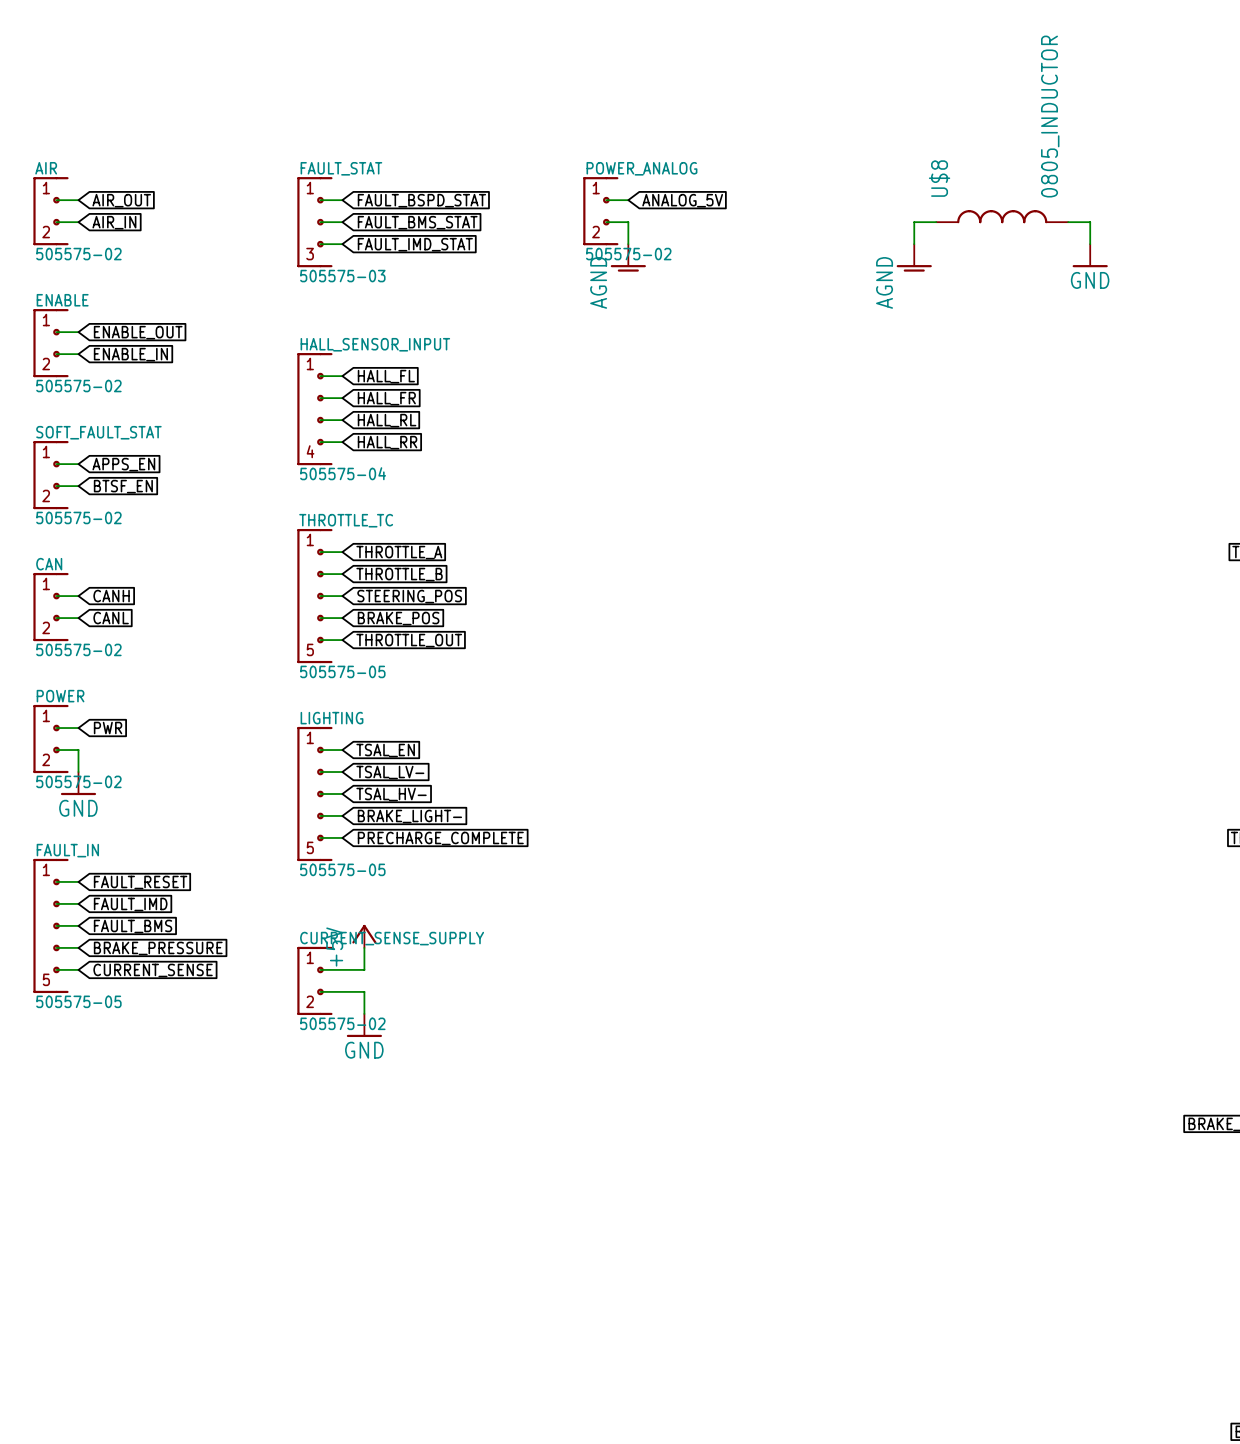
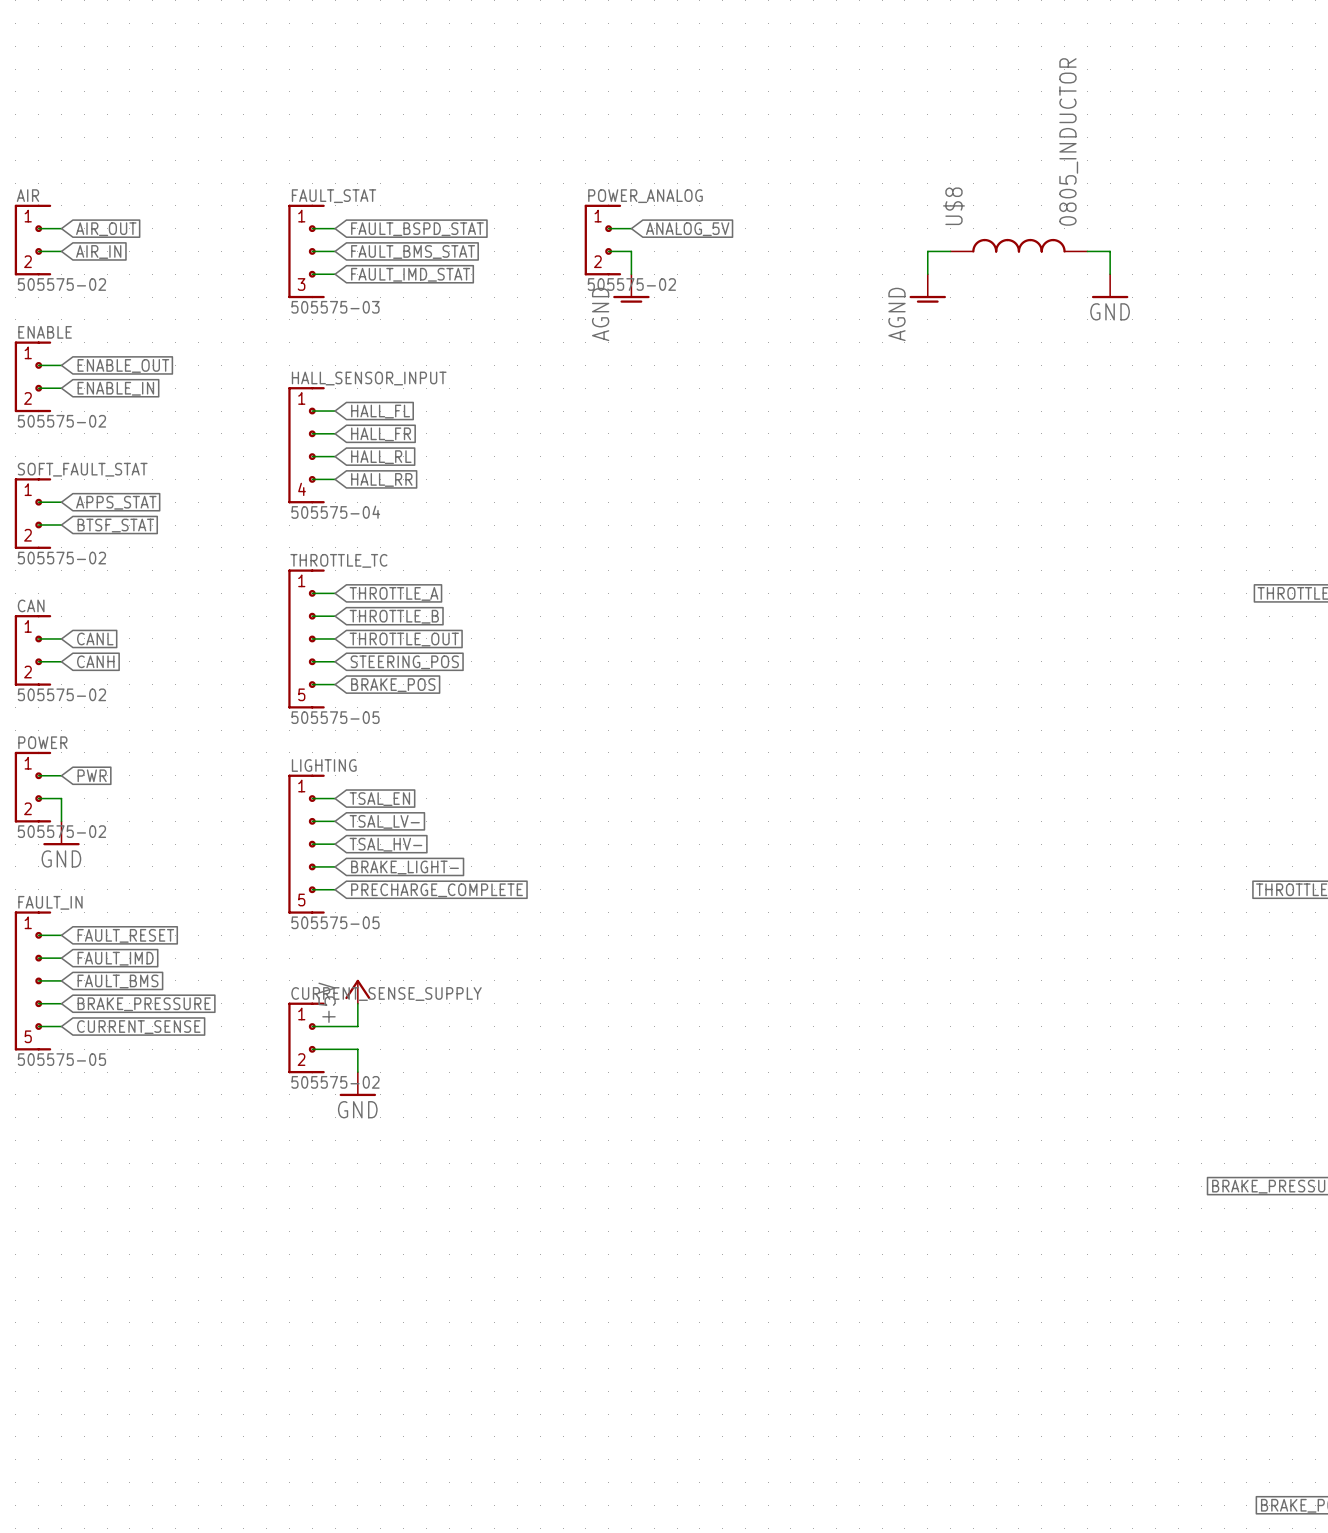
global label: APPS_EN (123, 464) -> APPS_STAT (116, 502)
global label: BTSF_EN (123, 486) -> BTSF_STAT (115, 525)
global label: CANH (111, 596) -> CANL (95, 638)
global label: STEERING_POS (409, 596) -> THROTTLE_OUT (404, 639)
global label: CANL (111, 618) -> CANH (95, 661)
global label: BRAKE_POS (398, 618) -> STEERING_POS (404, 662)
global label: THROTTLE_OUT (409, 640) -> BRAKE_POS (393, 685)

